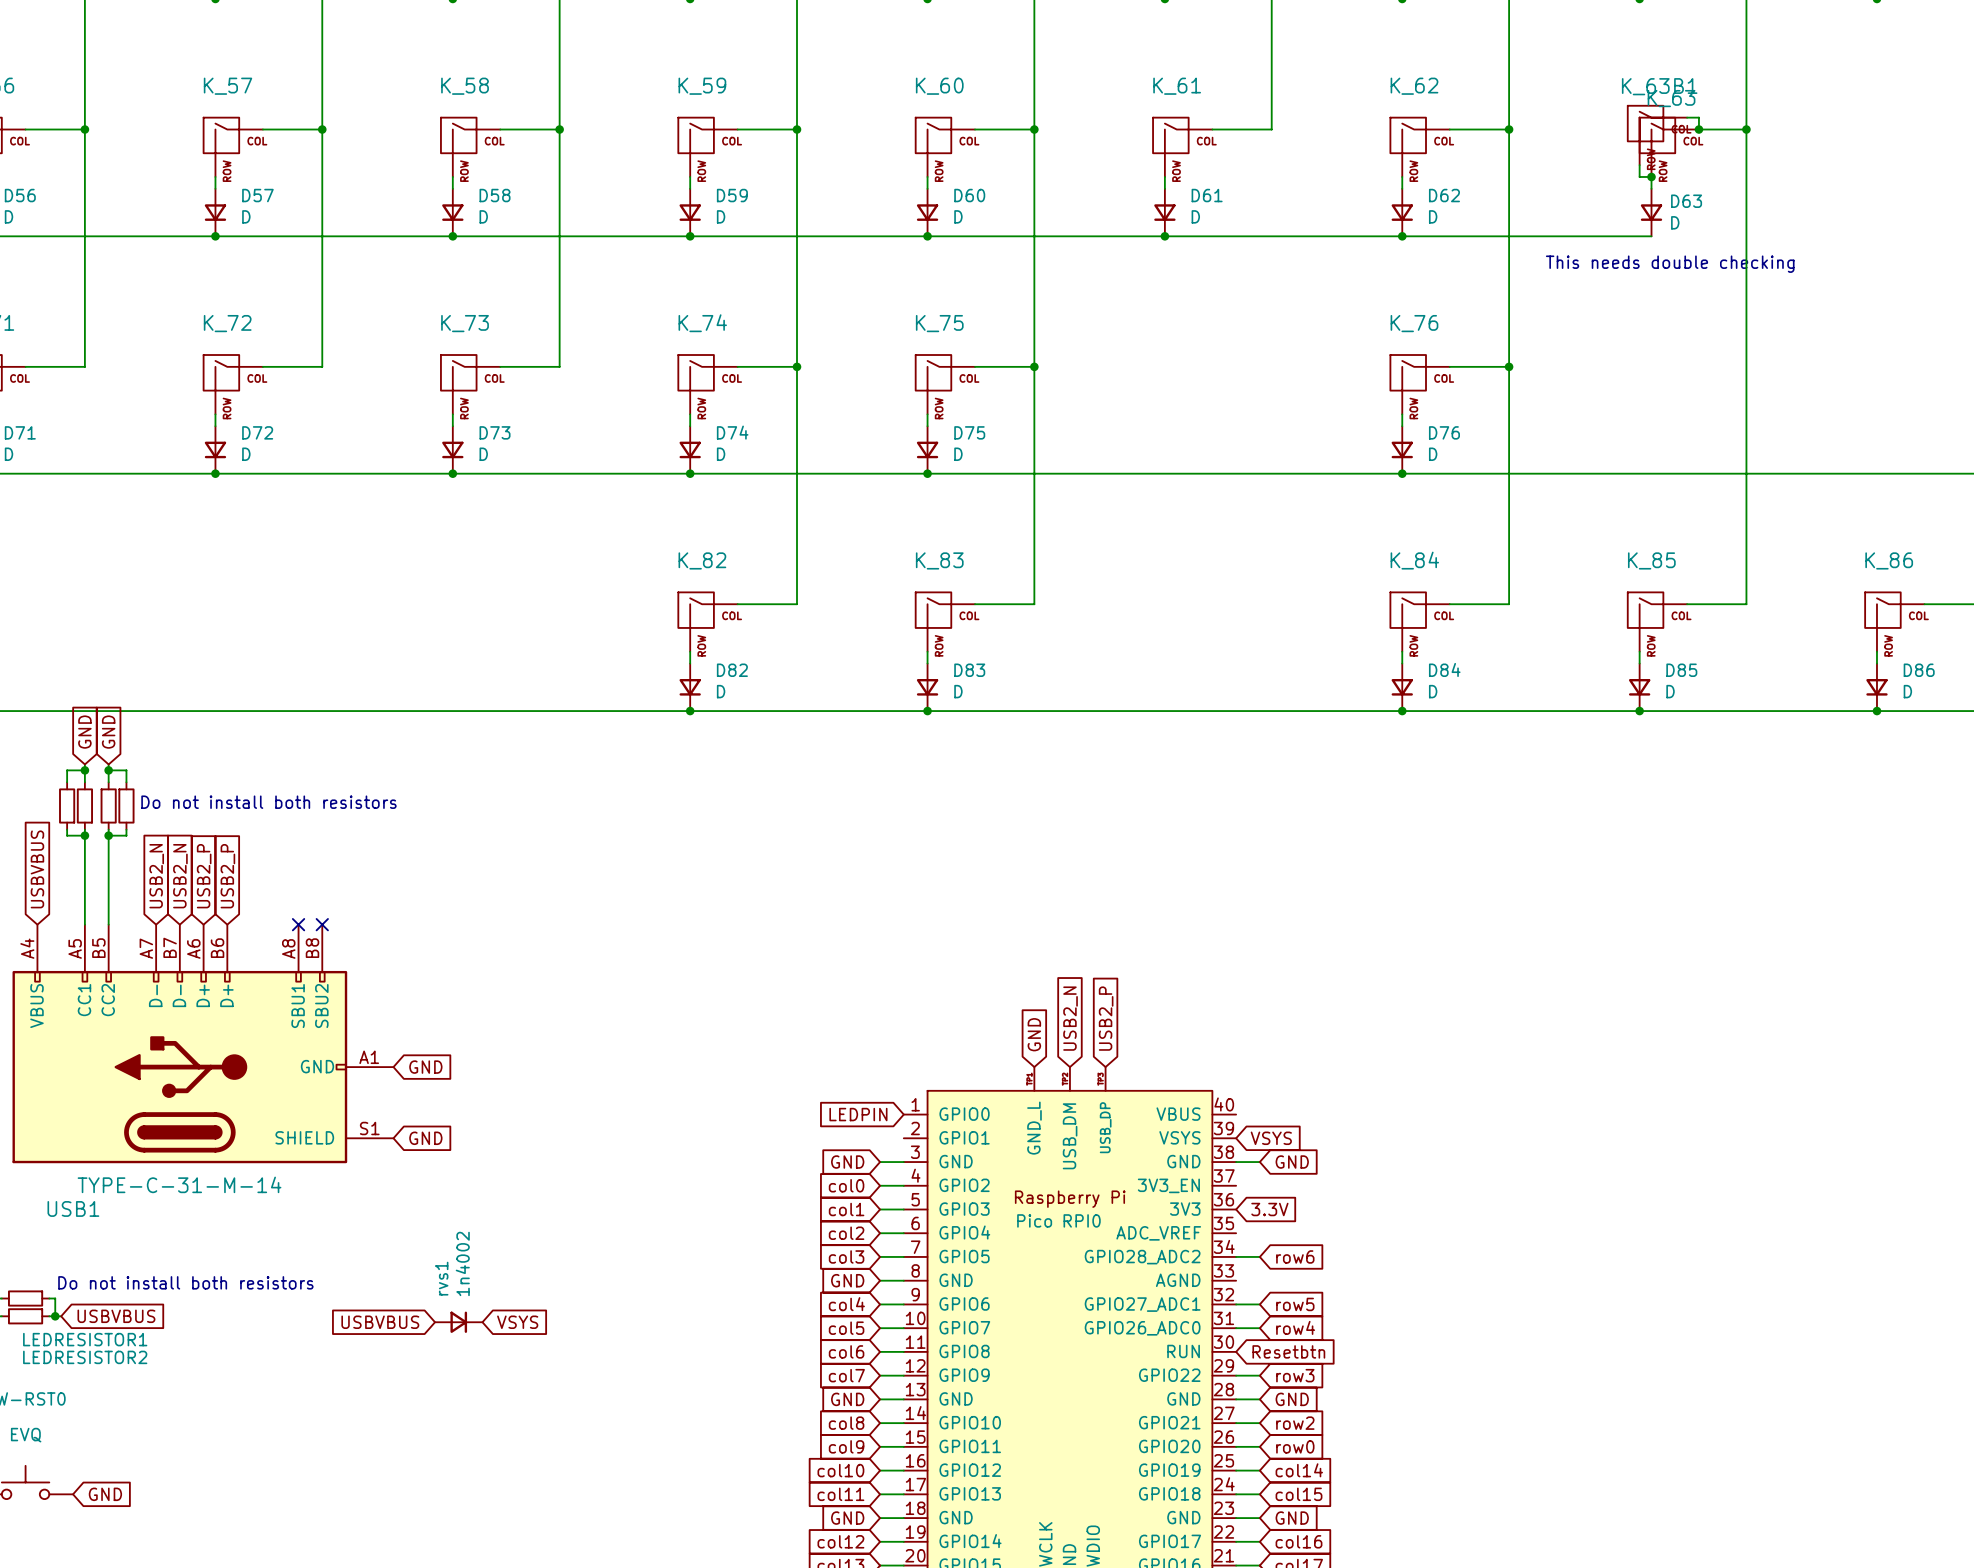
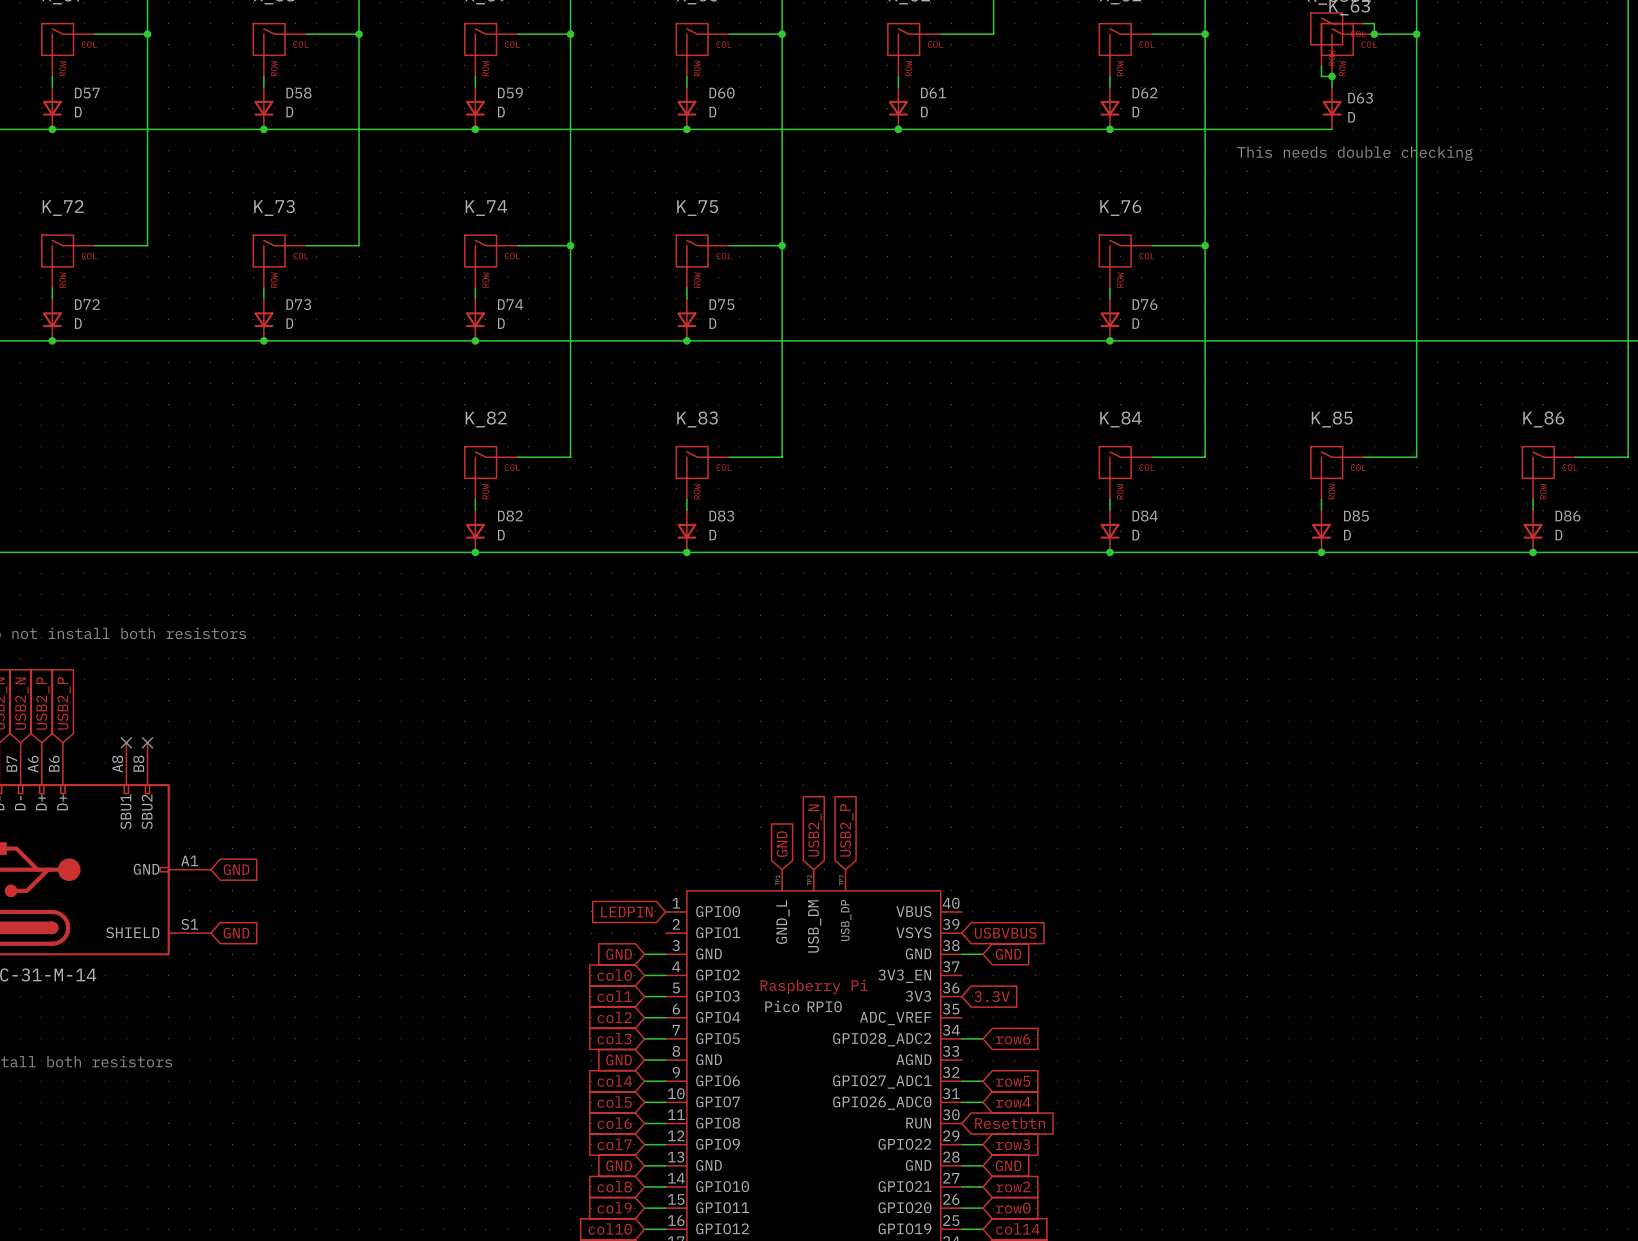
global label: VSYS (1271, 1138) -> USBVBUS (1005, 933)
global label: USBVBUS (380, 1322) -> none
rvs1: 1n4002 (458, 1322) -> none
global label: VSYS (517, 1322) -> none

